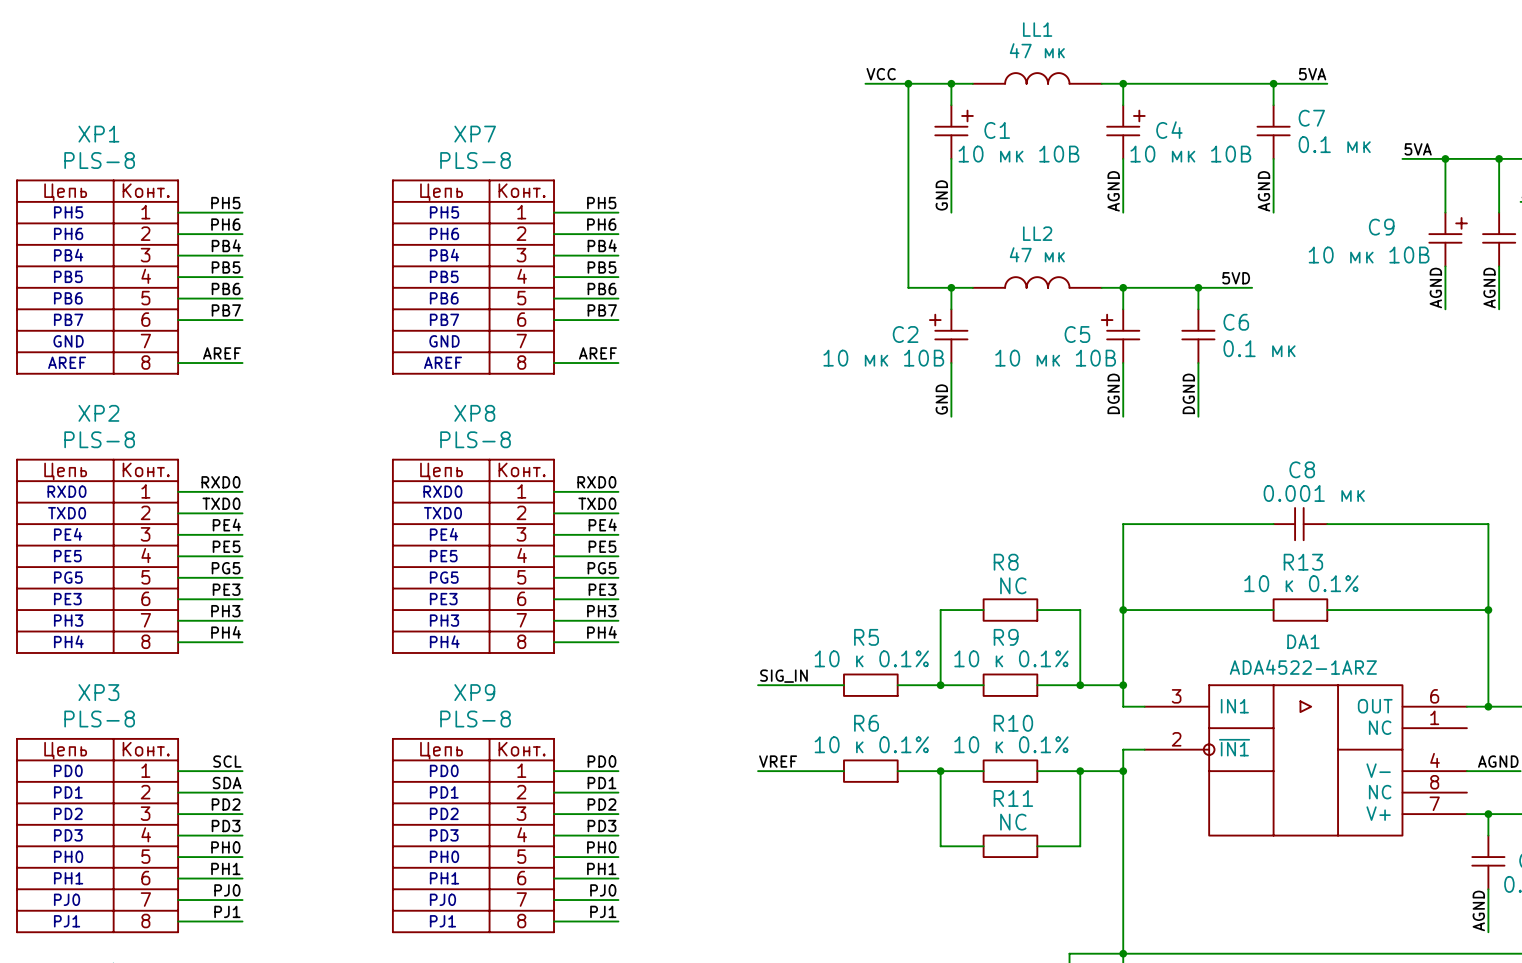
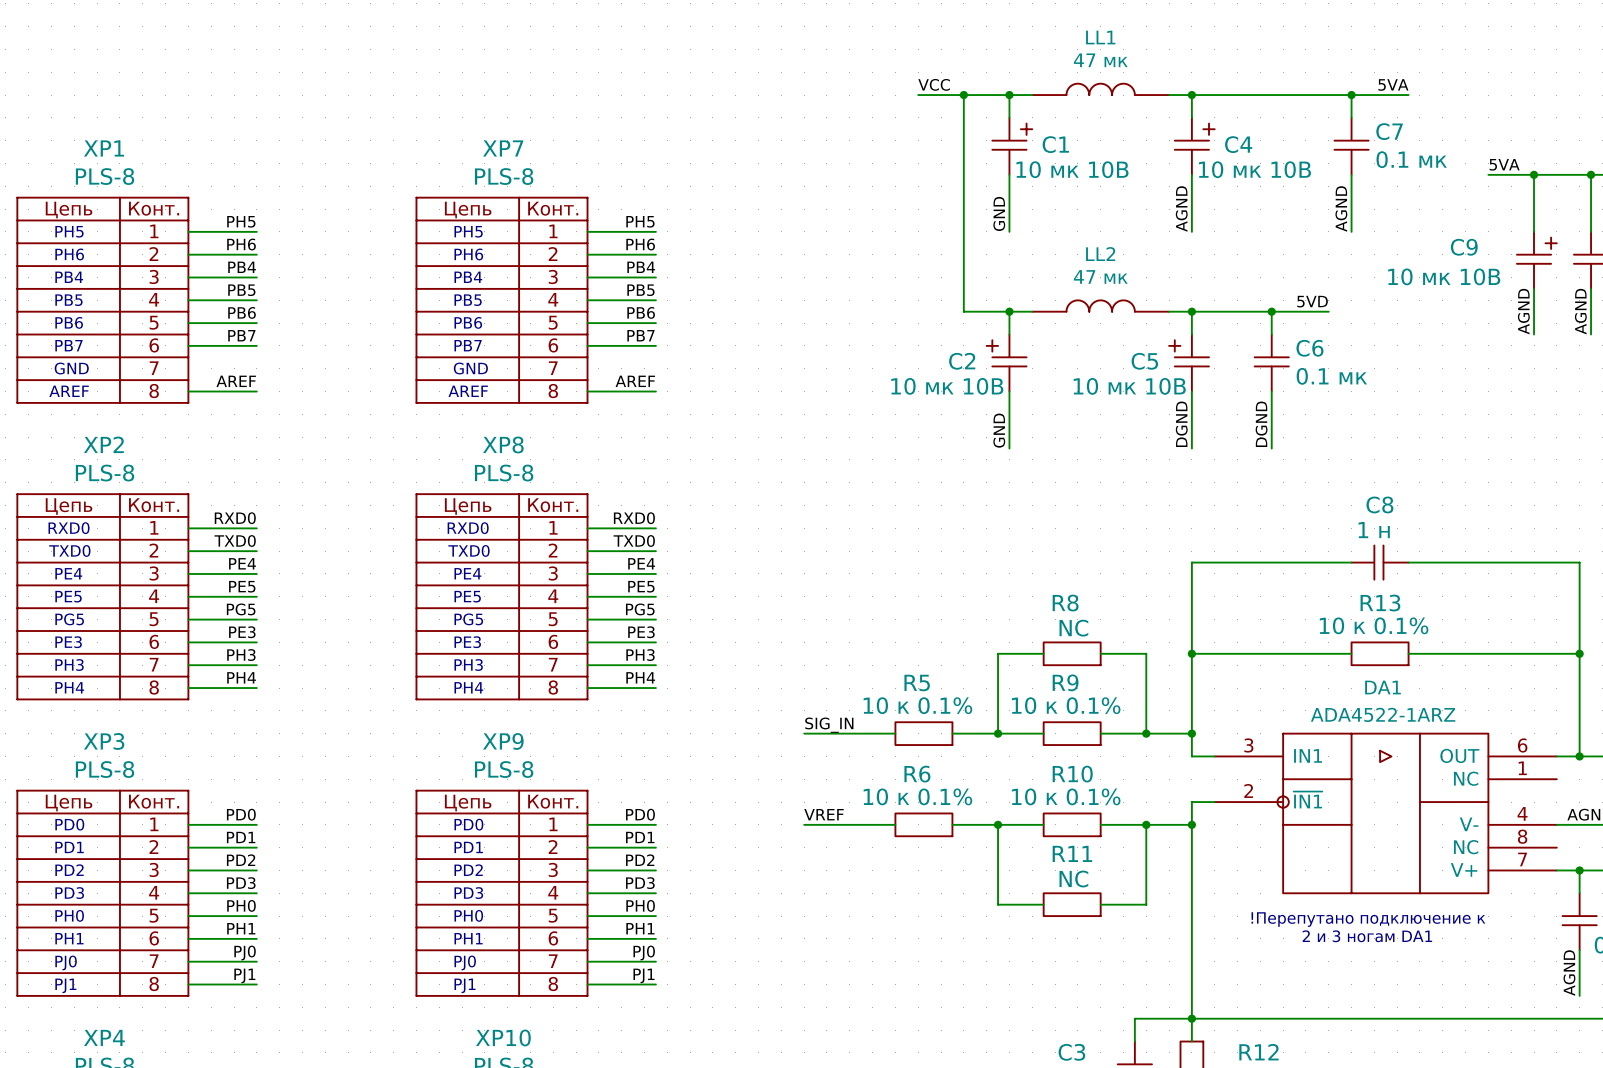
C8 value: 0.001 мк (1314, 493) -> 1 н (1374, 530)
label: SCL (227, 761) -> PD0 (241, 814)
label: SDA (227, 783) -> PD1 (241, 837)
text: none -> !Перепутано подключение к (1368, 919)
text: none -> 2 и 3 ногам DA1 (1367, 936)

